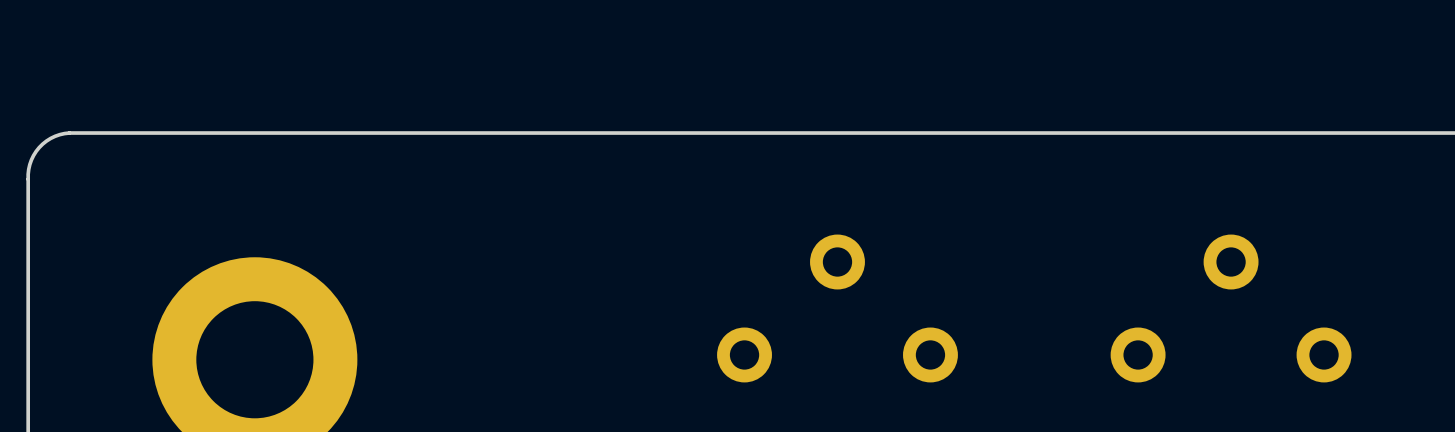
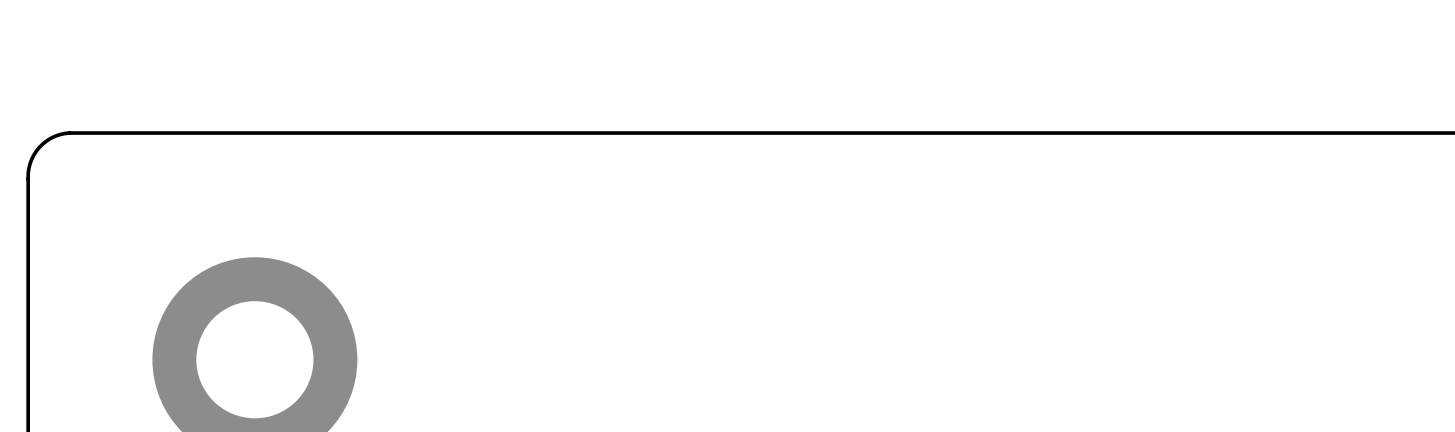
part: (837, 308) -> none
part: (1231, 308) -> none

